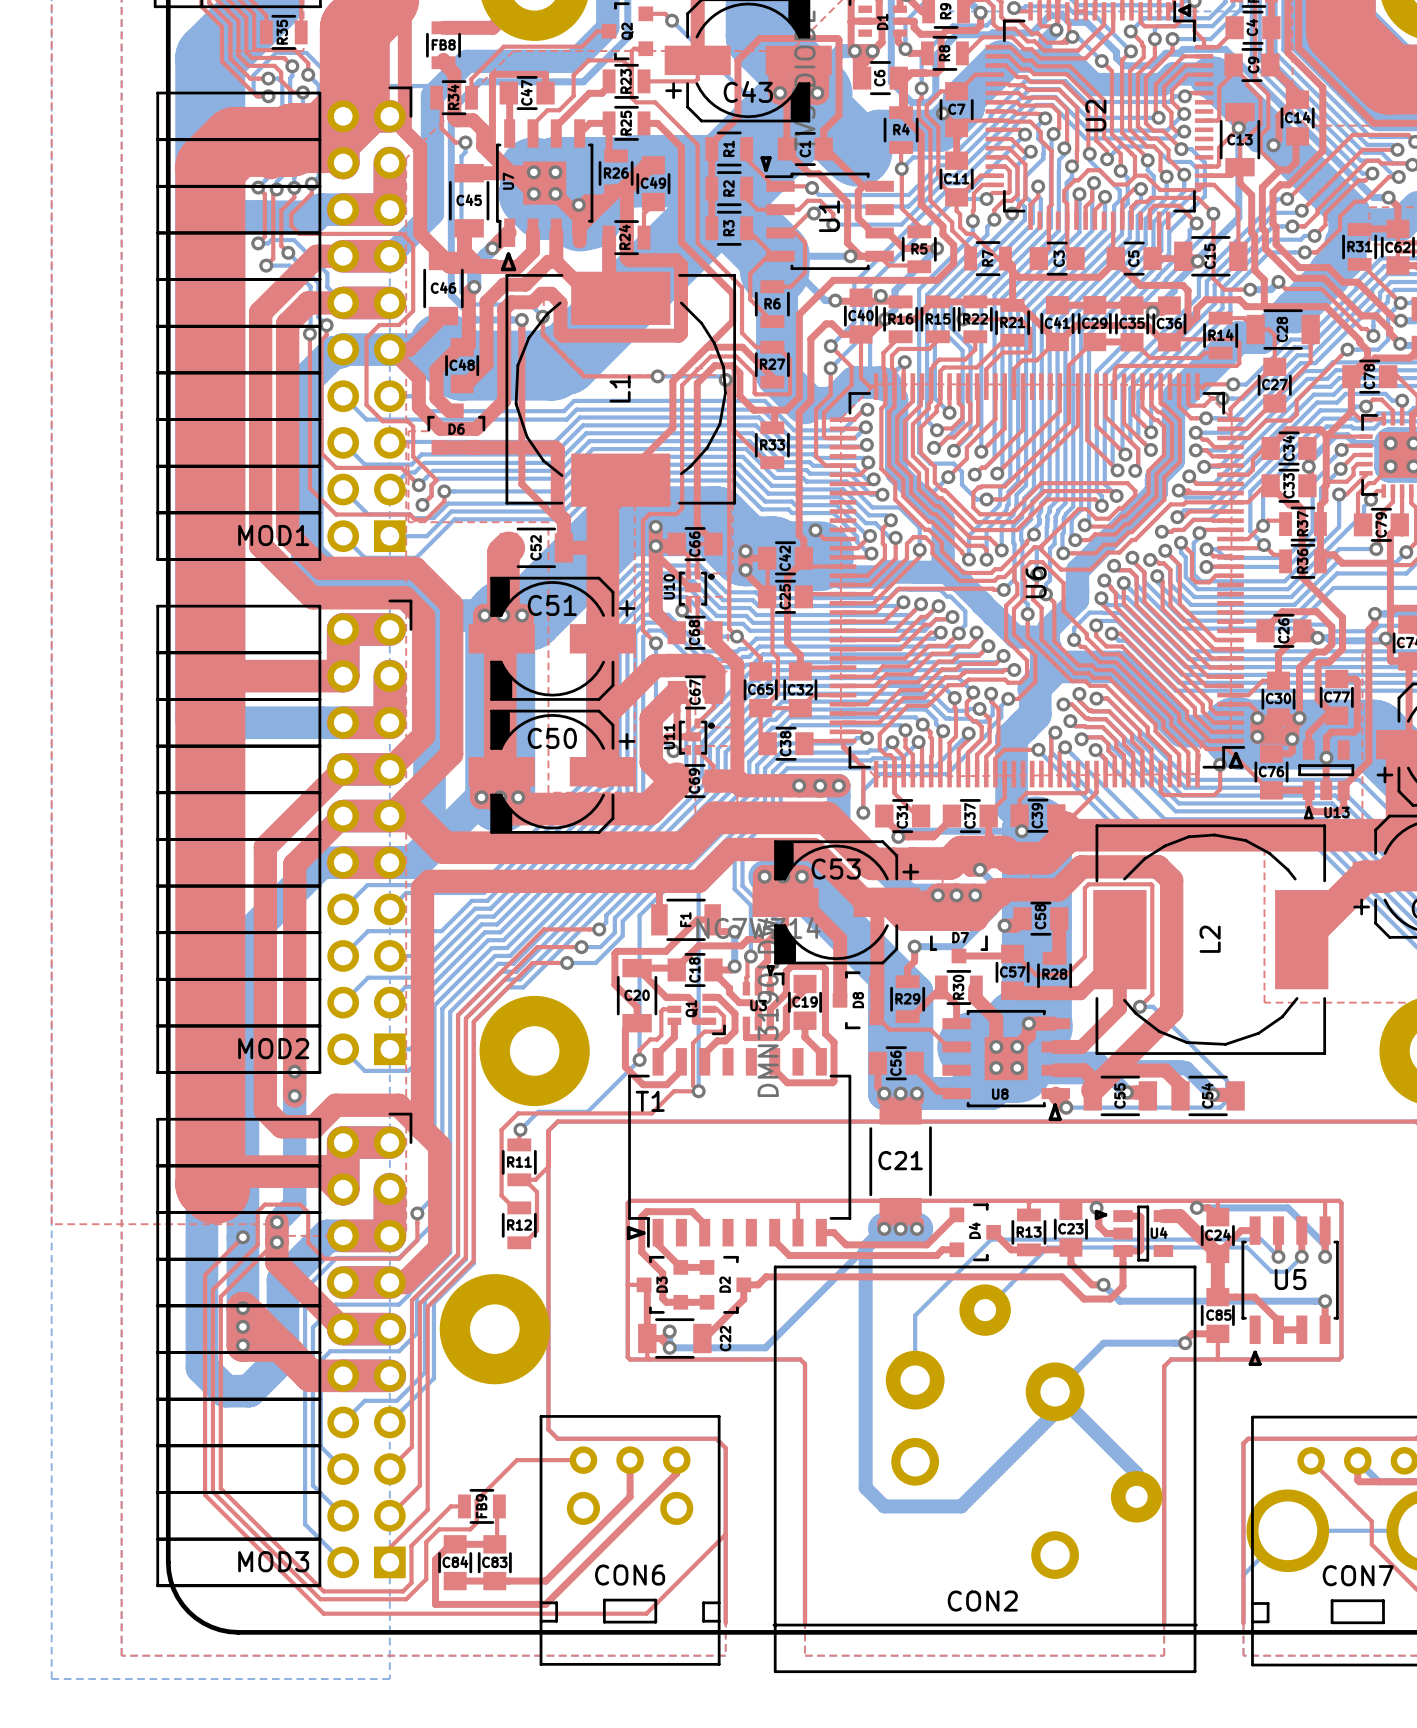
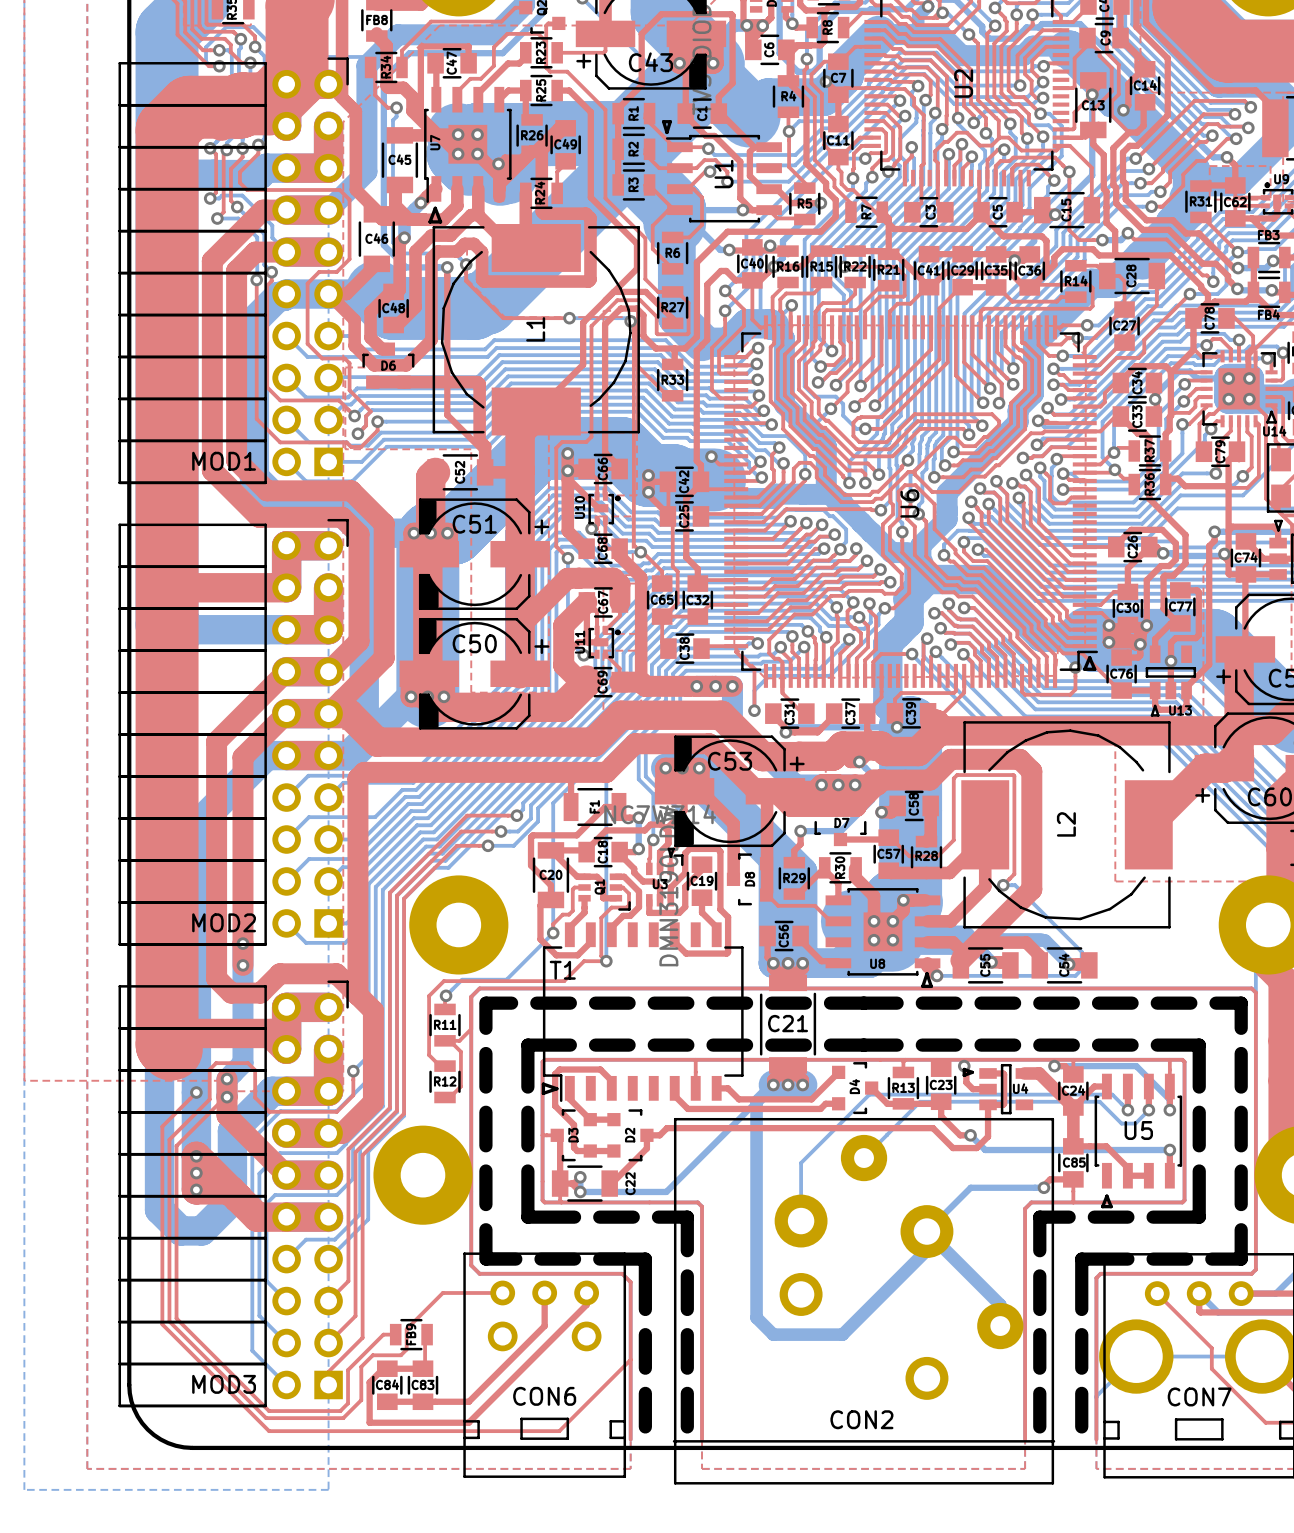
line: none -> (485, 1003) (485, 1028)
line: none -> (486, 1003) (511, 1003)
line: none -> (536, 1003) (570, 1003)
line: none -> (595, 1003) (629, 1003)
line: none -> (654, 1003) (687, 1003)
line: none -> (713, 1003) (746, 1003)
line: none -> (771, 1003) (805, 1003)
line: none -> (830, 1003) (897, 1003)
line: none -> (922, 1003) (955, 1003)
line: none -> (981, 1003) (1014, 1003)
line: none -> (1039, 1003) (1073, 1003)
line: none -> (1098, 1003) (1132, 1003)
line: none -> (1157, 1003) (1190, 1003)
line: none -> (1216, 1003) (1241, 1003) (1241, 1028)
line: none -> (570, 1045) (527, 1045) (527, 1087)
line: none -> (595, 1045) (629, 1045)
line: none -> (654, 1045) (687, 1045)
line: none -> (713, 1045) (746, 1045)
line: none -> (771, 1045) (805, 1045)
line: none -> (830, 1045) (897, 1045)
line: none -> (922, 1045) (955, 1045)
line: none -> (981, 1045) (1014, 1045)
line: none -> (1039, 1045) (1073, 1045)
line: none -> (1098, 1045) (1132, 1045)
line: none -> (1157, 1045) (1199, 1045) (1199, 1087)
line: none -> (485, 1053) (485, 1087)
line: none -> (1241, 1053) (1241, 1087)
line: none -> (485, 1112) (485, 1145)
line: none -> (527, 1112) (527, 1145)
line: none -> (1199, 1112) (1199, 1145)
line: none -> (1241, 1112) (1241, 1145)
line: none -> (485, 1170) (485, 1204)
line: none -> (527, 1170) (527, 1217) (574, 1217)
line: none -> (1199, 1170) (1199, 1217) (1153, 1217)
line: none -> (1241, 1170) (1241, 1204)
line: none -> (599, 1217) (633, 1217)
line: none -> (658, 1217) (687, 1217) (687, 1250)
line: none -> (1069, 1217) (1039, 1217) (1039, 1250)
line: none -> (1094, 1217) (1127, 1217)
line: none -> (485, 1229) (485, 1259)
line: none -> (1241, 1229) (1241, 1259) (1211, 1259)
line: none -> (486, 1259) (515, 1259)
line: none -> (540, 1259) (574, 1259)
line: none -> (599, 1259) (645, 1259) (645, 1309)
line: none -> (1127, 1259) (1081, 1259) (1081, 1309)
line: none -> (1153, 1259) (1186, 1259)
line: none -> (687, 1275) (687, 1309)
line: none -> (1039, 1275) (1039, 1309)
line: none -> (645, 1334) (645, 1368)
line: none -> (687, 1334) (687, 1368)
line: none -> (1039, 1334) (1039, 1368)
line: none -> (1081, 1334) (1081, 1368)
line: none -> (645, 1393) (645, 1426)
line: none -> (687, 1393) (687, 1426)
line: none -> (1039, 1393) (1039, 1426)
line: none -> (1081, 1393) (1081, 1426)

